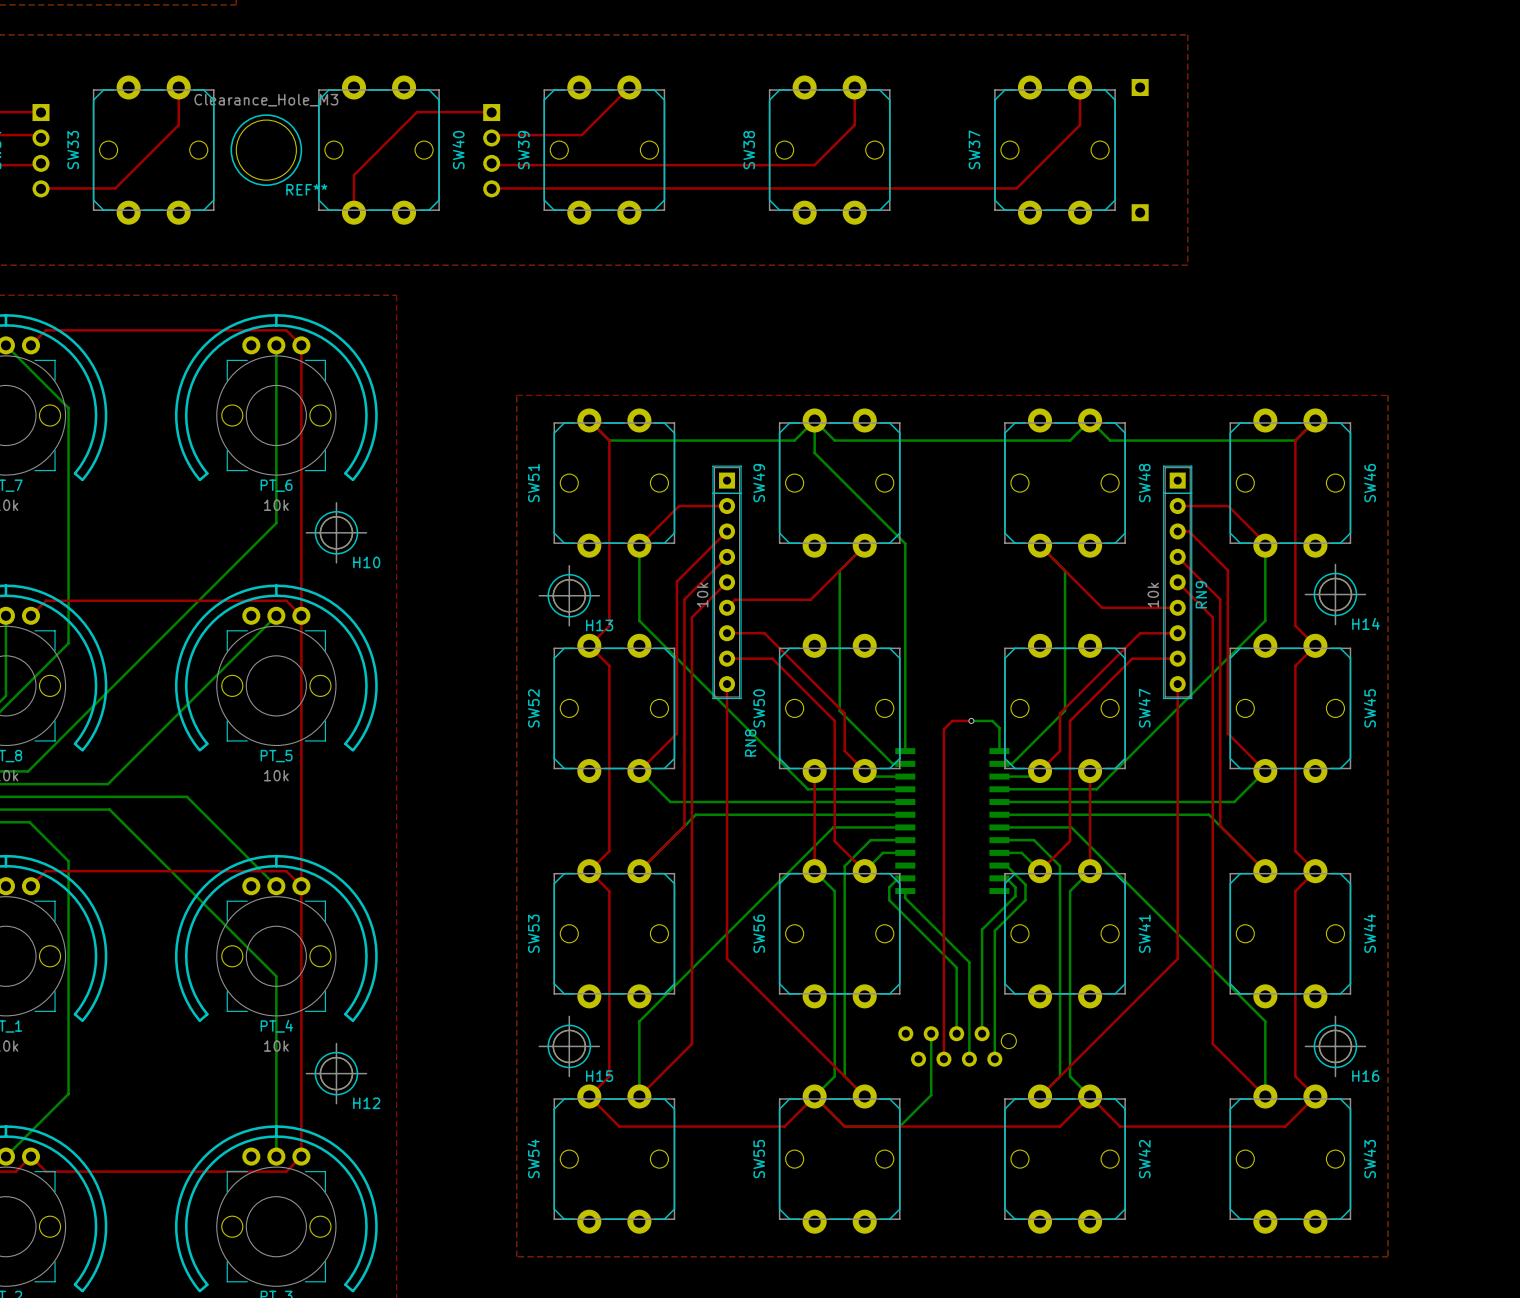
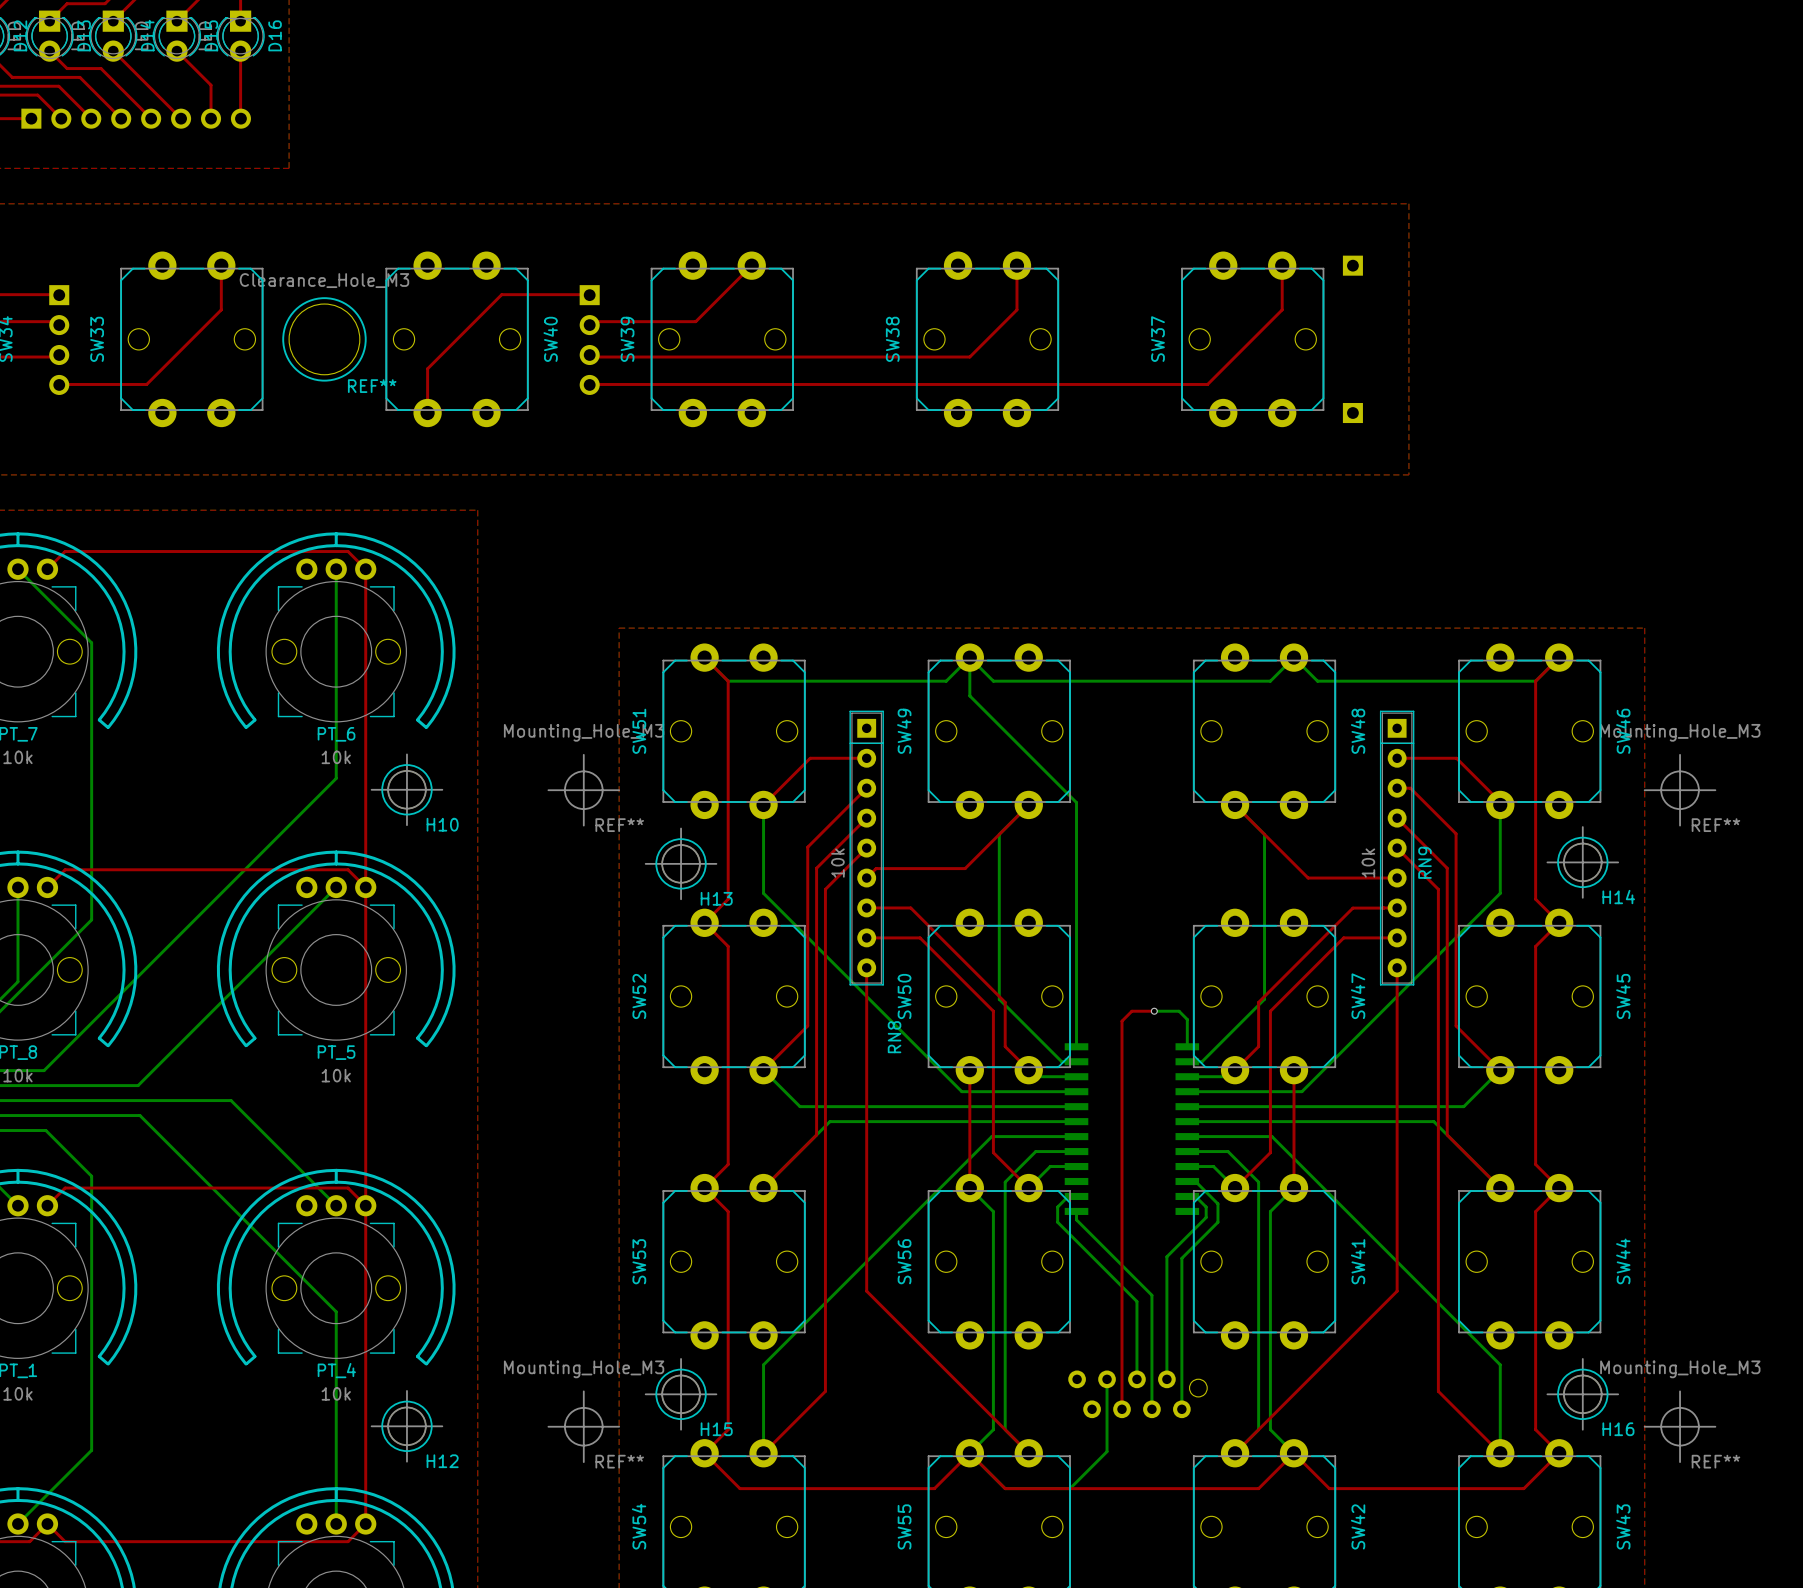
REF**: none -> Mounting_Hole_M3 (583, 790)
REF**: none -> Mounting_Hole_M3 (1680, 790)
REF**: none -> Mounting_Hole_M3 (583, 1426)
REF**: none -> Mounting_Hole_M3 (1680, 1426)

